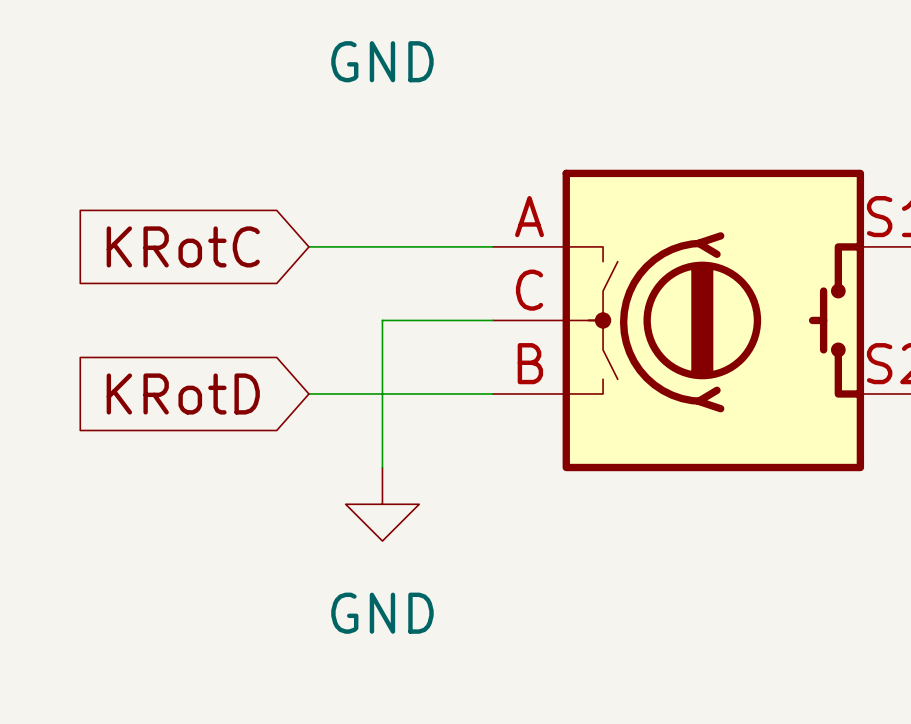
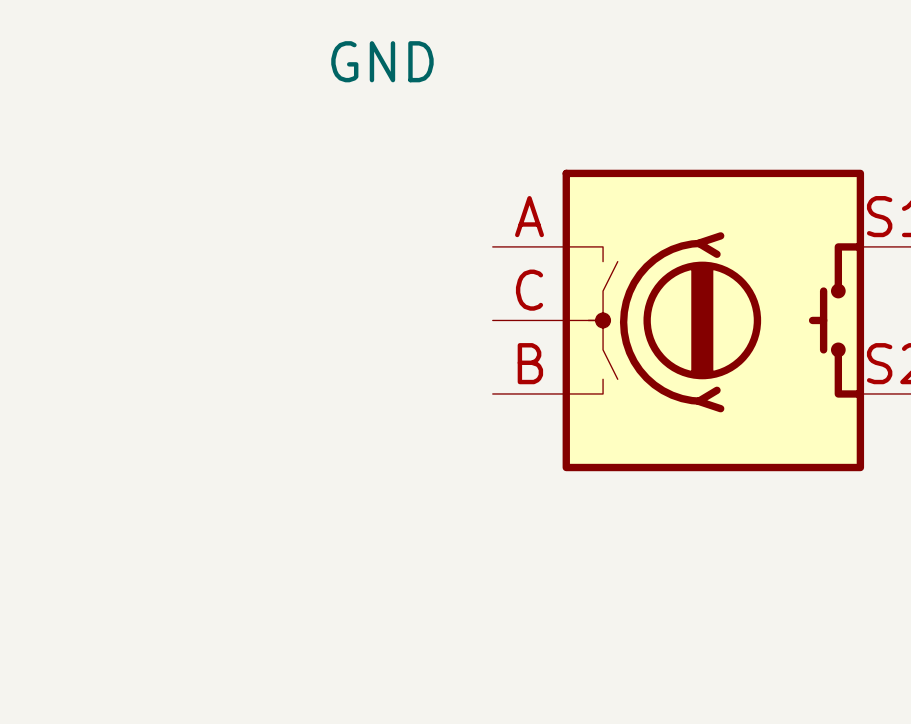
global label: KRotC (183, 246) -> none
wire: (308, 246) (492, 246) -> none
wire: (492, 320) (382, 320) (382, 467) -> none
global label: KRotD (183, 393) -> none
wire: (308, 393) (492, 393) -> none
power symbol: GND (382, 504) -> none

